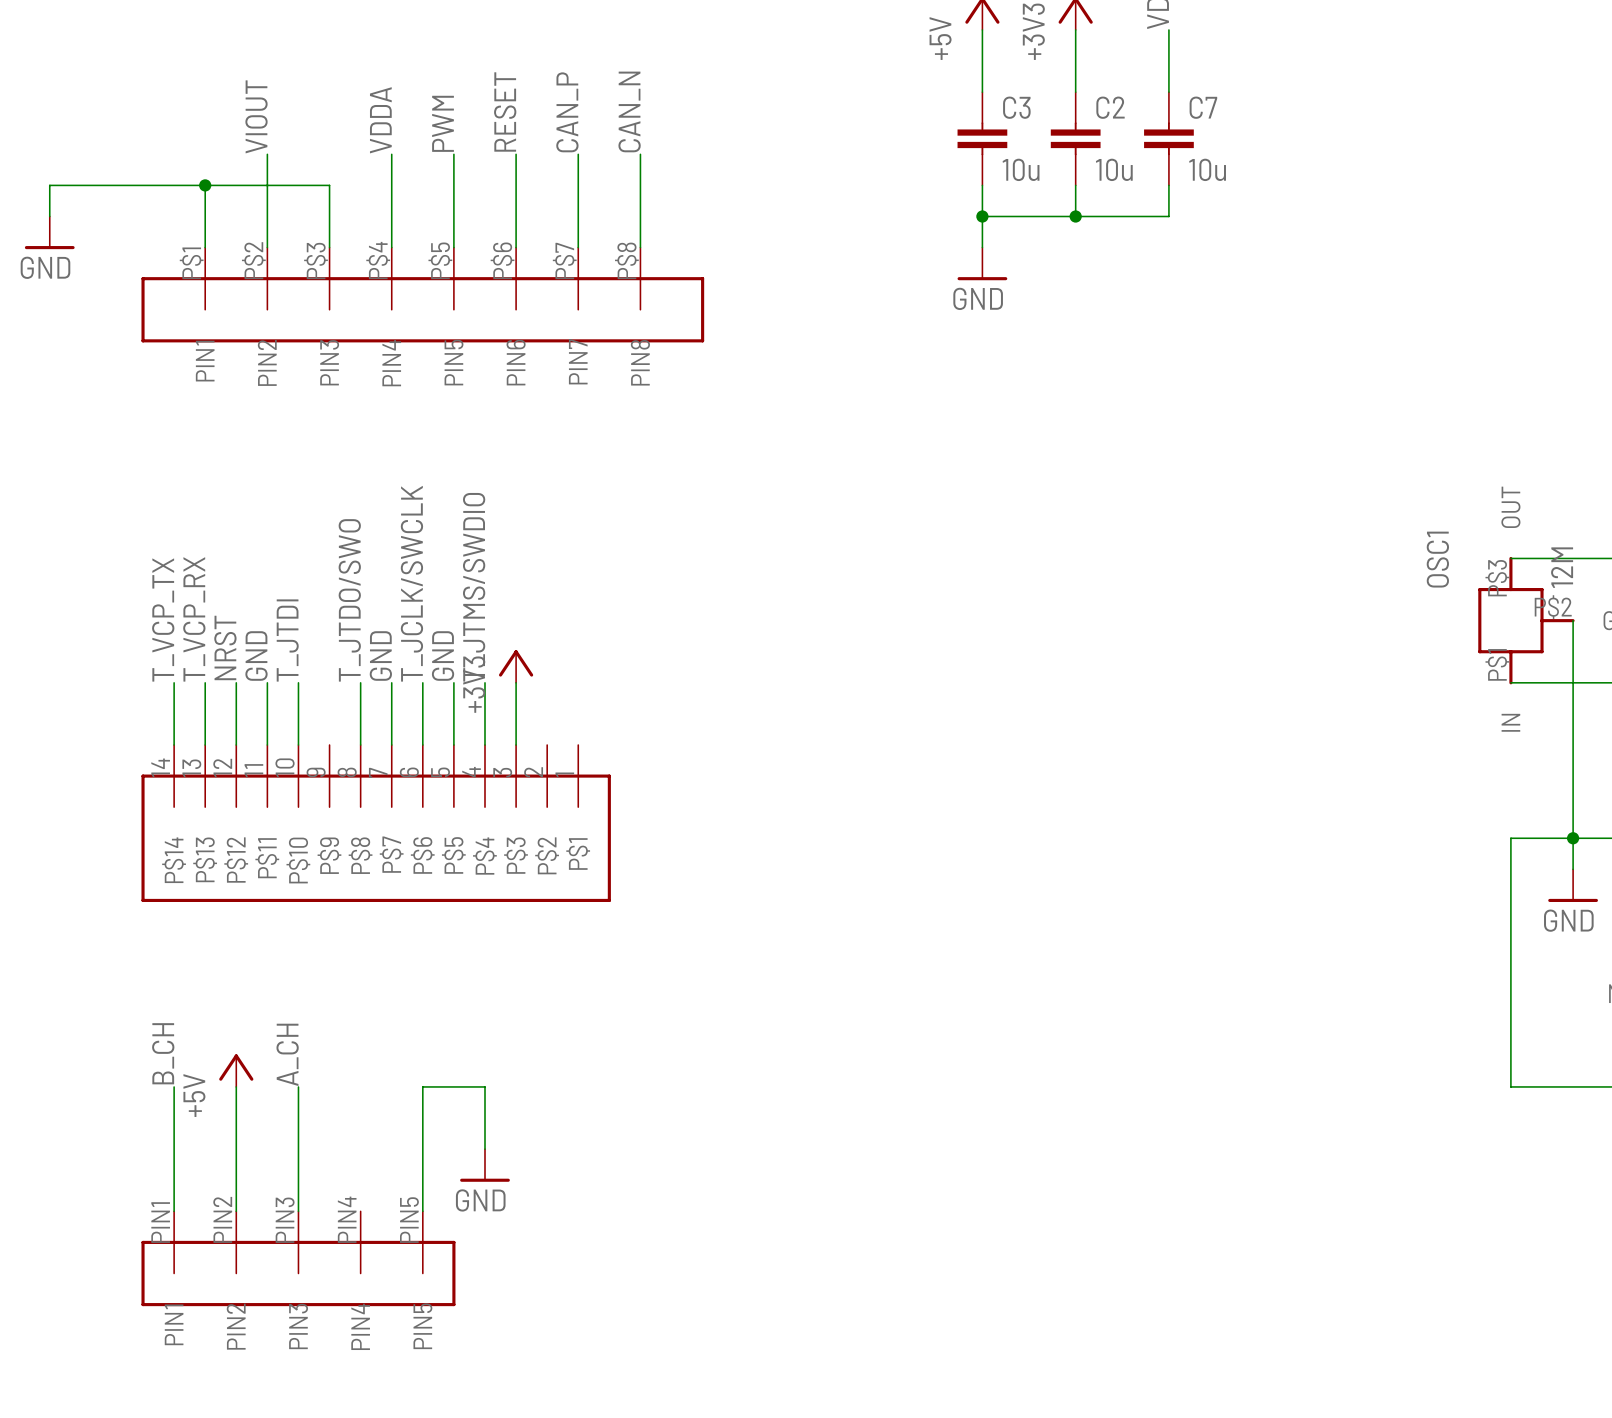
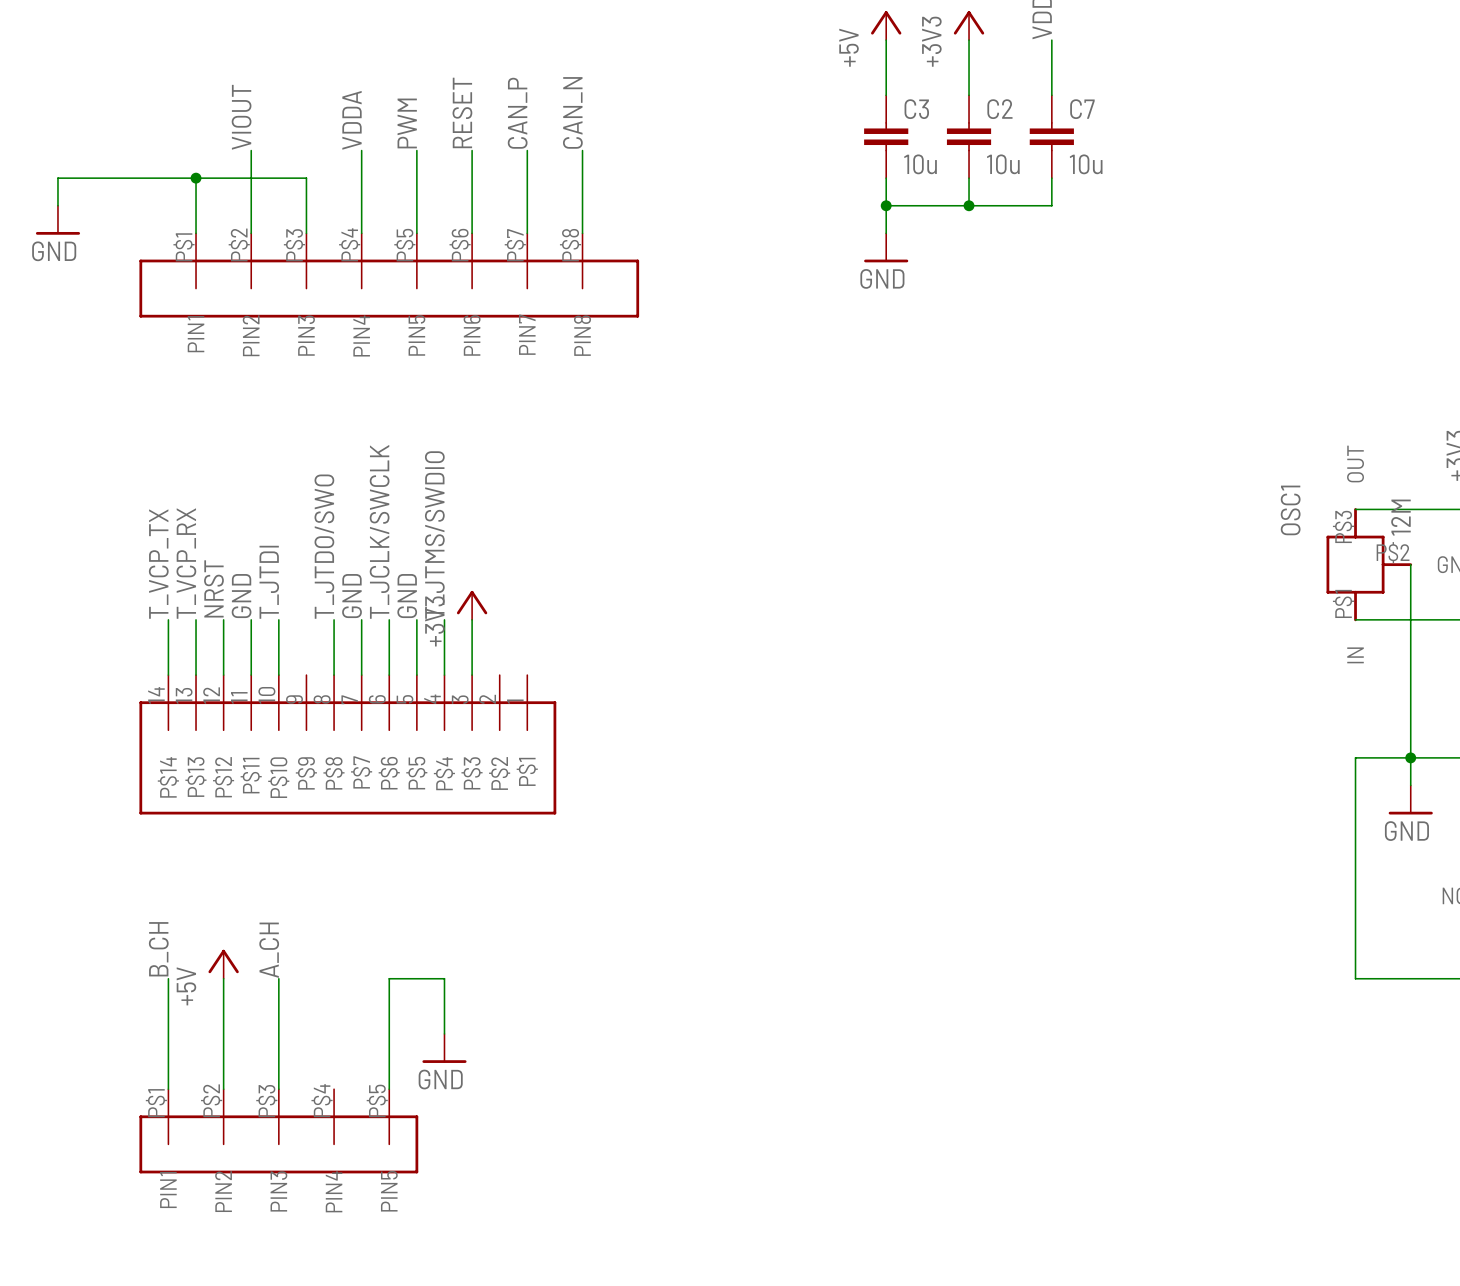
part pin number: PIN2 (222, 1219) -> P$2 (211, 1100)
part pin number: PIN4 (347, 1219) -> P$4 (322, 1100)
part pin number: PIN3 (285, 1220) -> P$3 (266, 1101)
part pin number: PIN5 (409, 1220) -> P$5 (377, 1100)
part pin number: PIN1 (160, 1222) -> P$1 (156, 1103)

